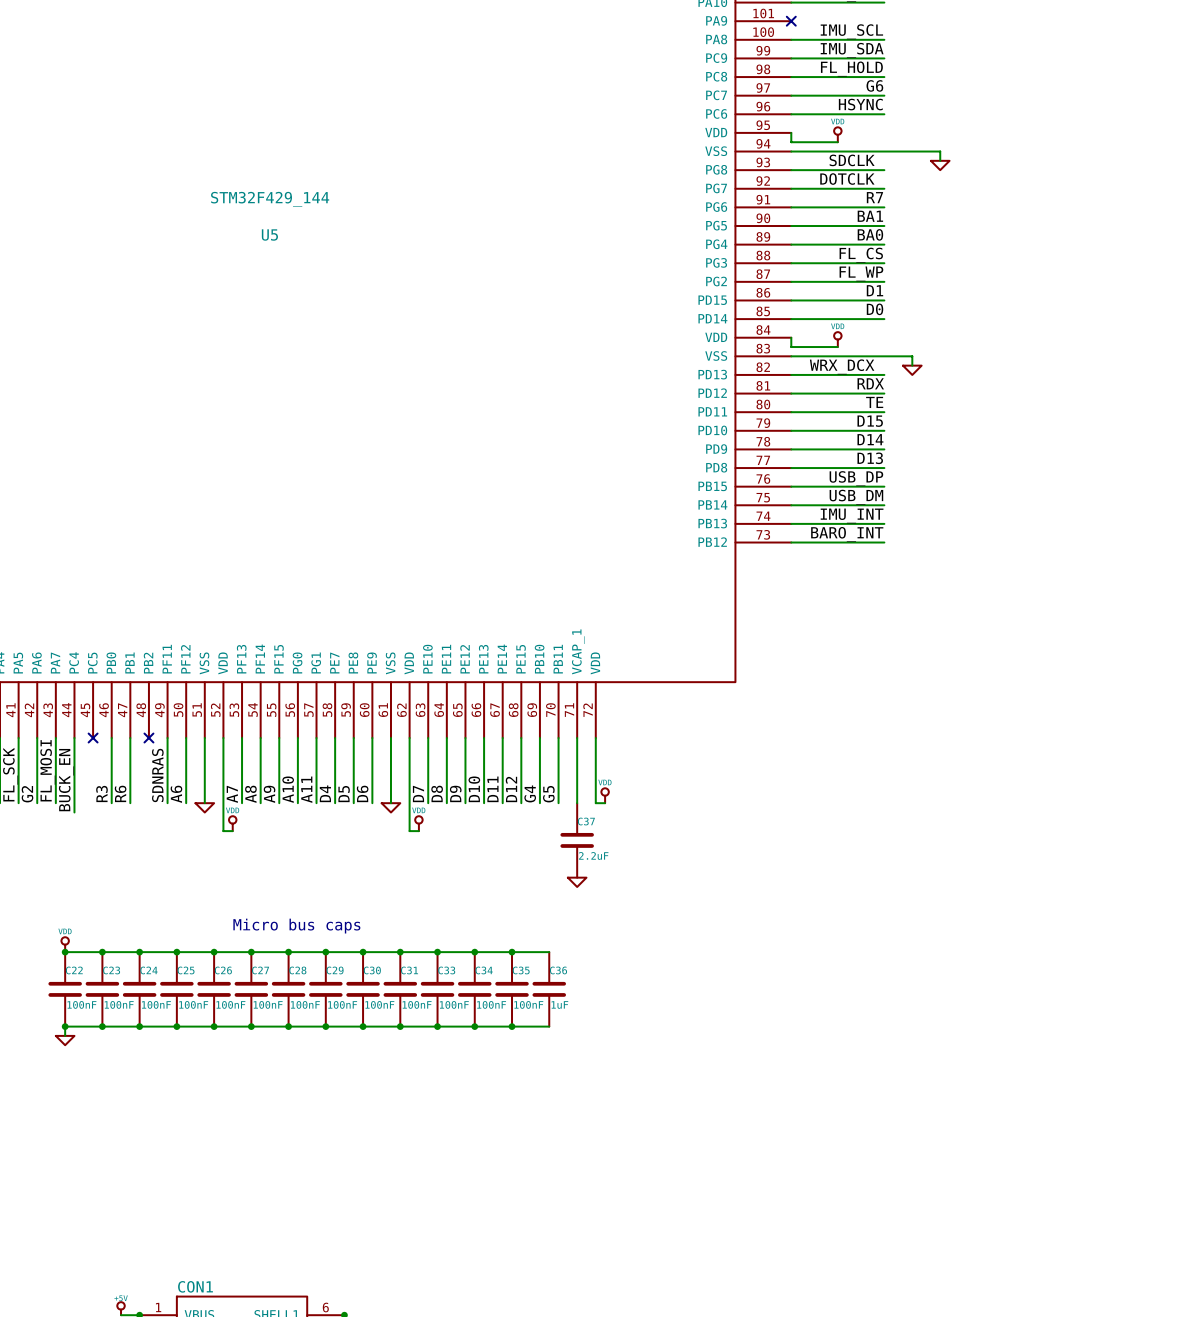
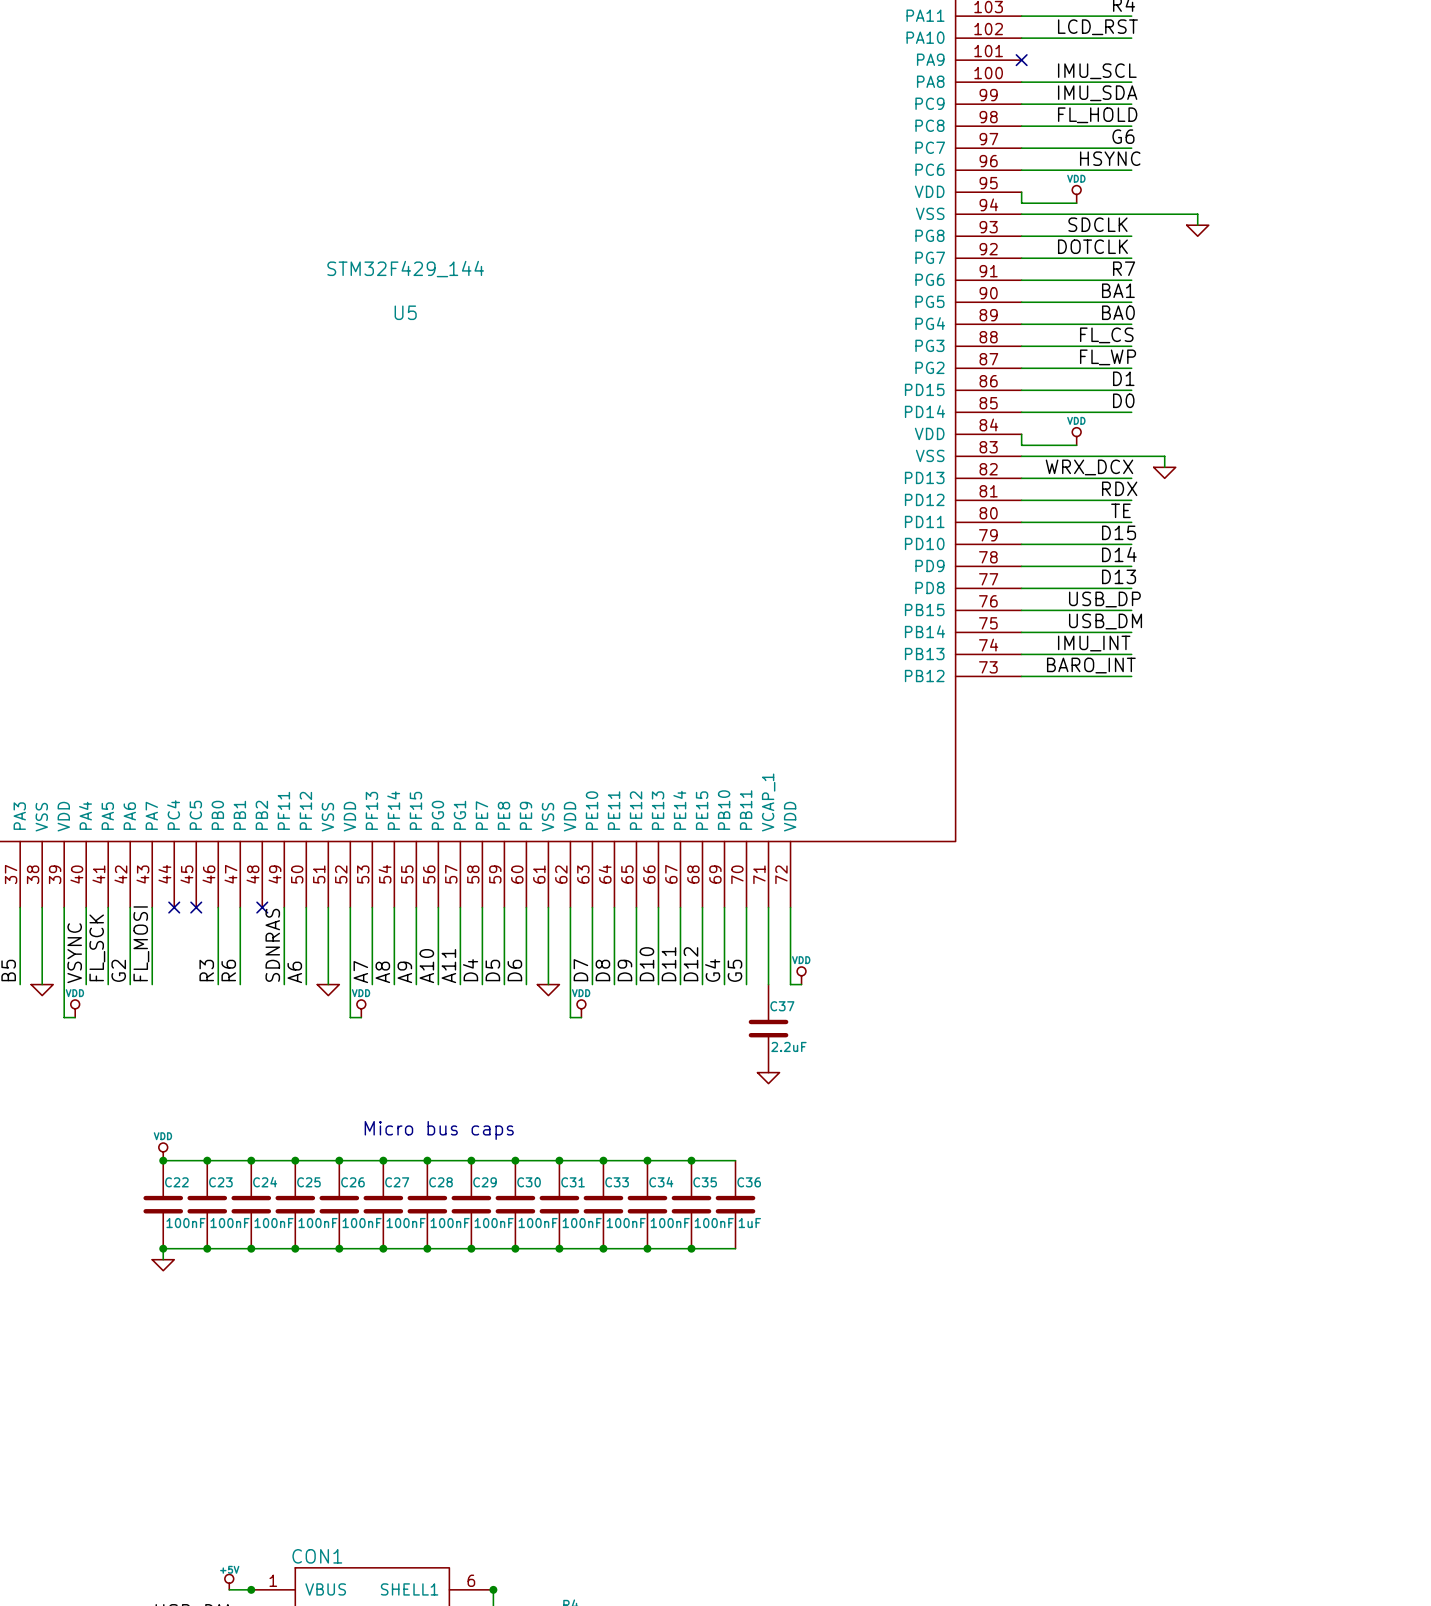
wire: (74, 738) (74, 812) -> none
no-connect mark: none -> (174, 907)
label: BUCK_EN (66, 780) -> none

